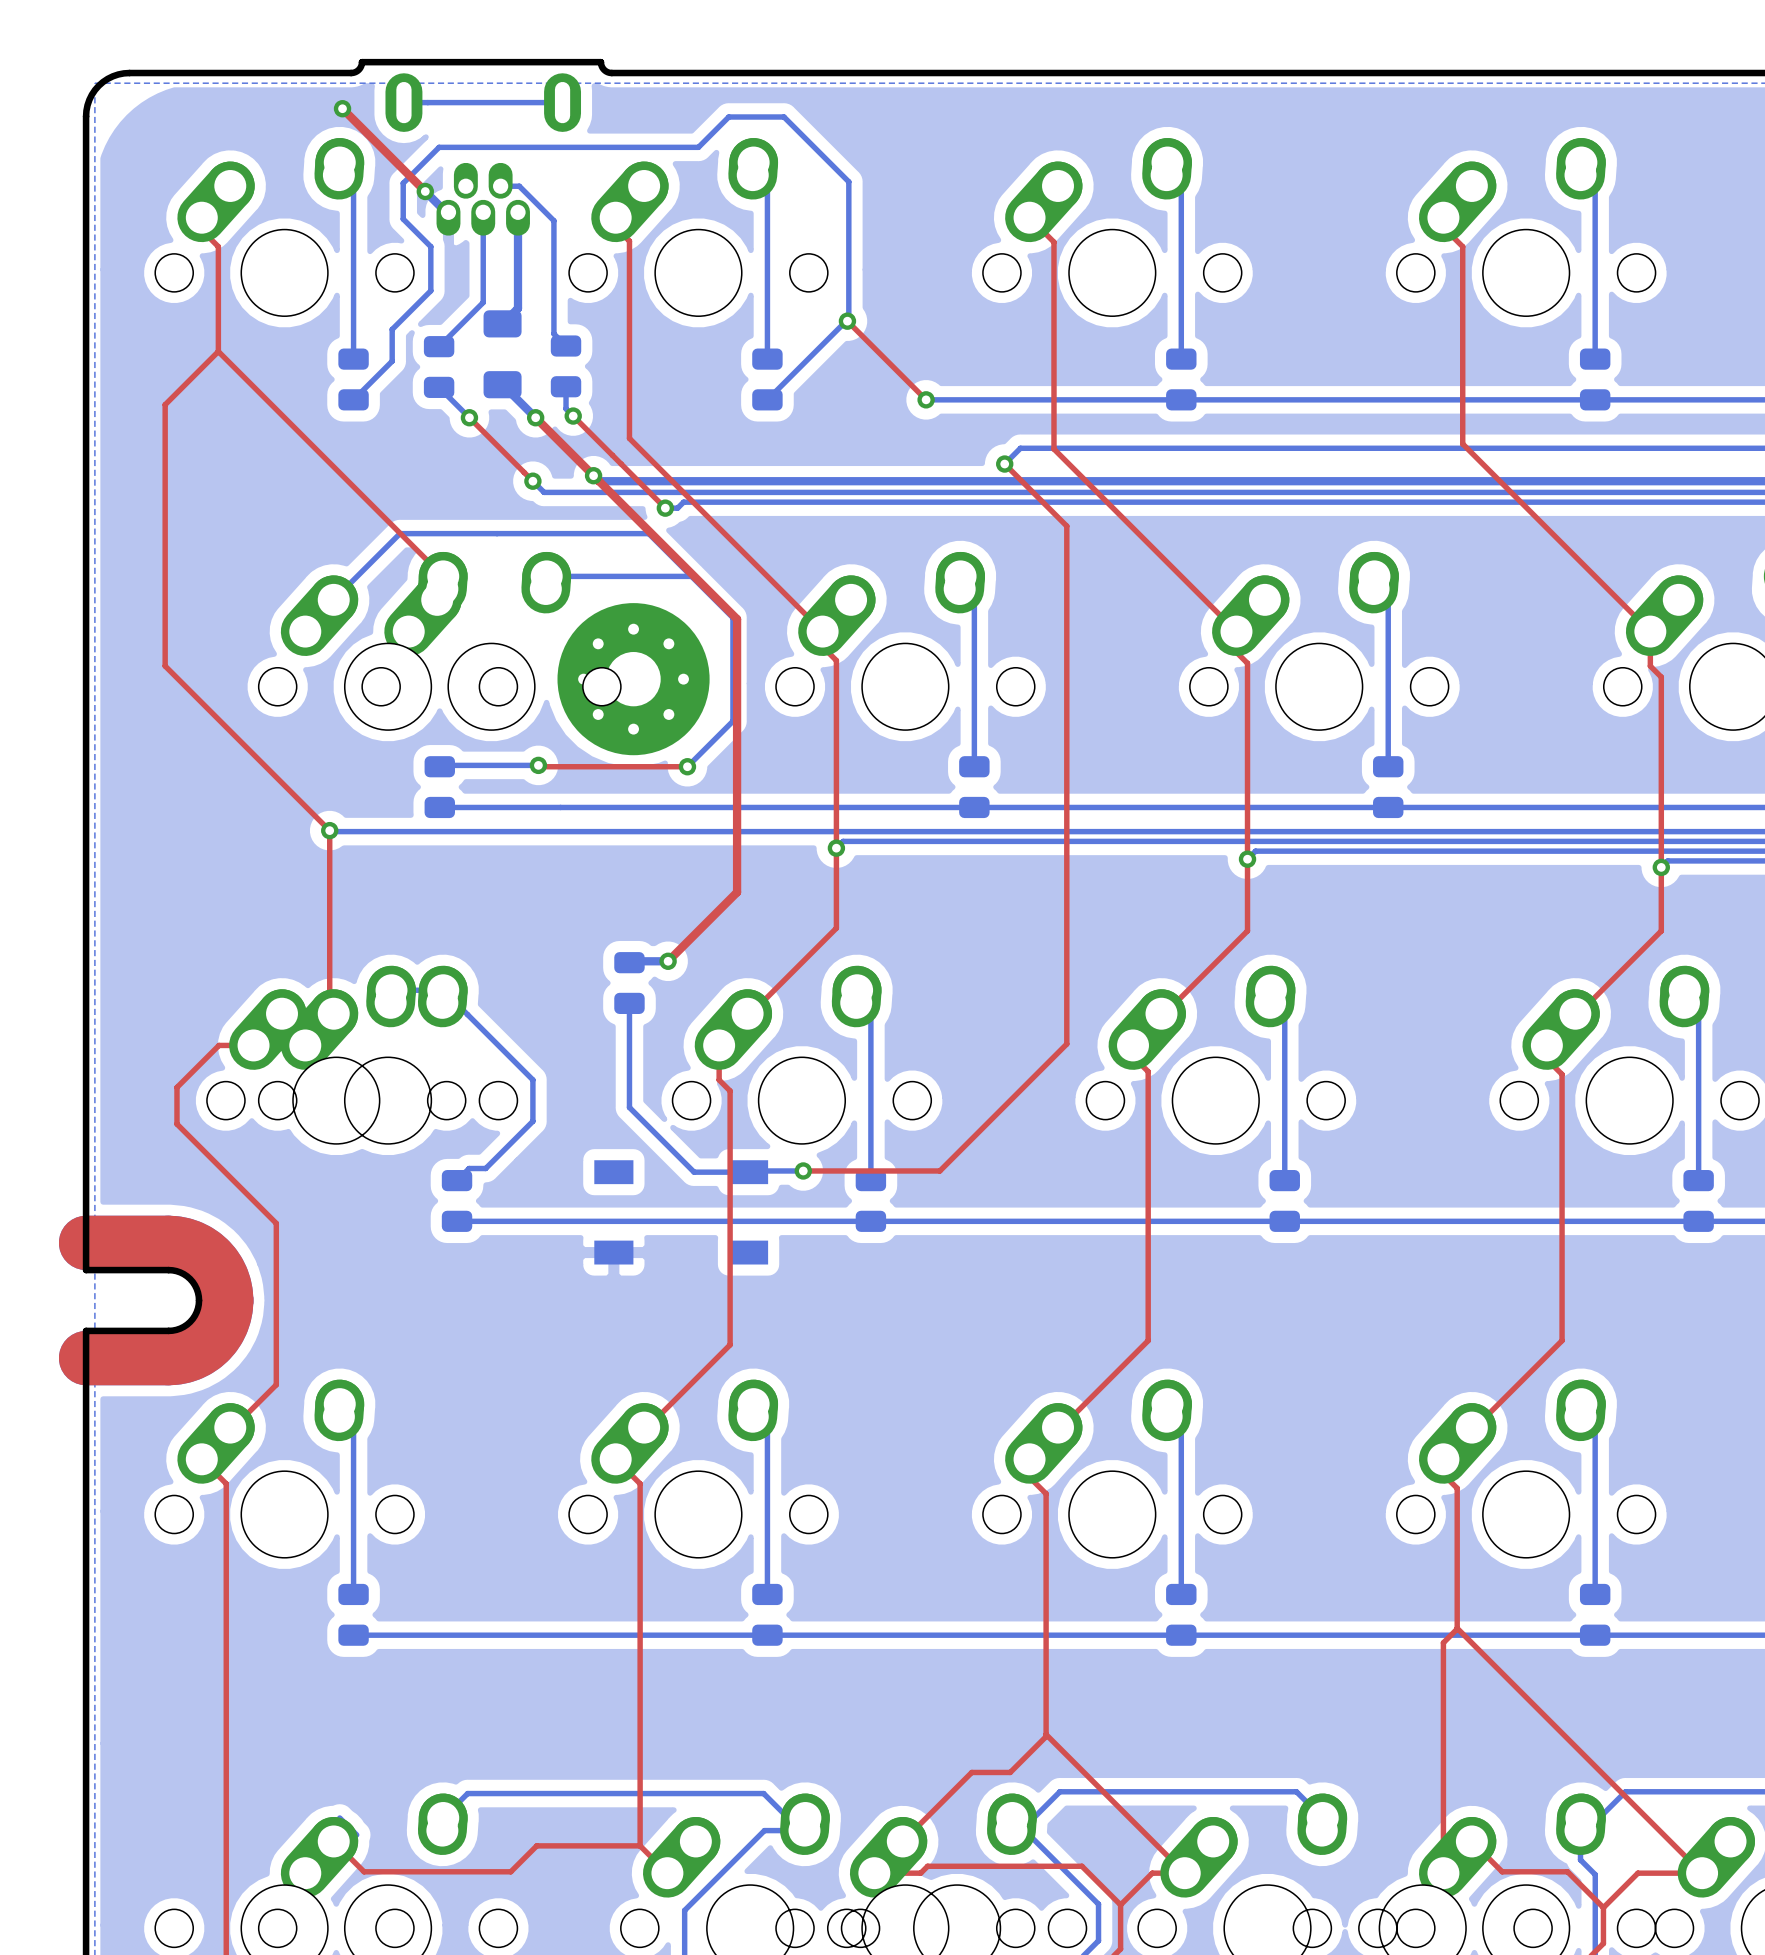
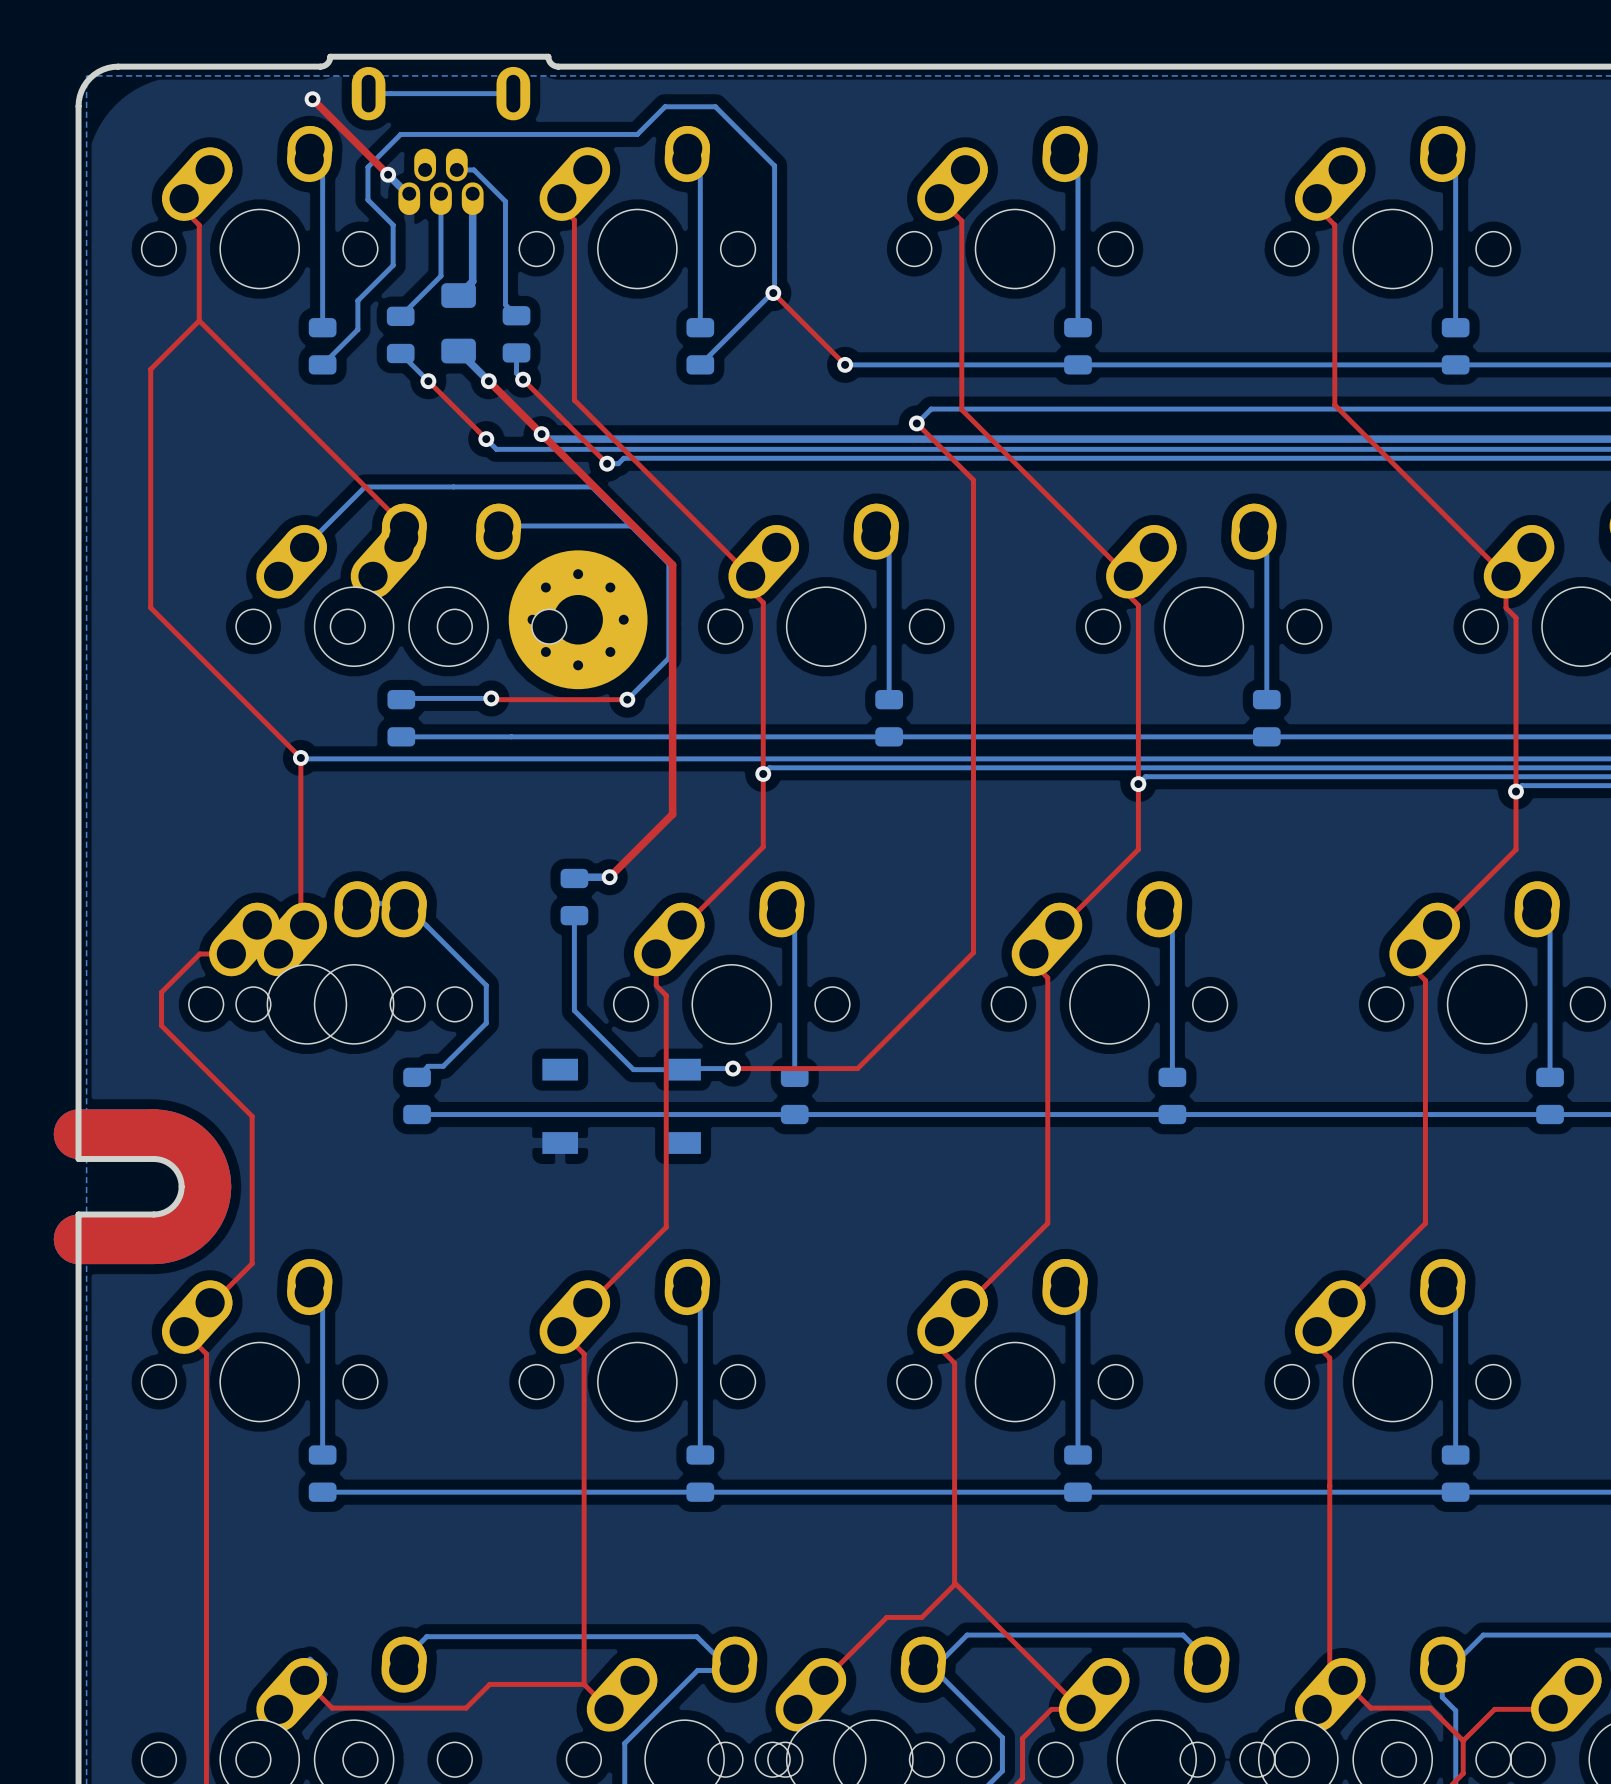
top track: (1457, 1628) (1443, 1642) (1443, 1873) -> (1329, 1486) (1329, 1667) (1343, 1680)
top track: (1457, 1628) (1702, 1873) -> none
top track: (874, 1873) (920, 1873) (927, 1866) (1081, 1866) (1120, 1904) -> none

